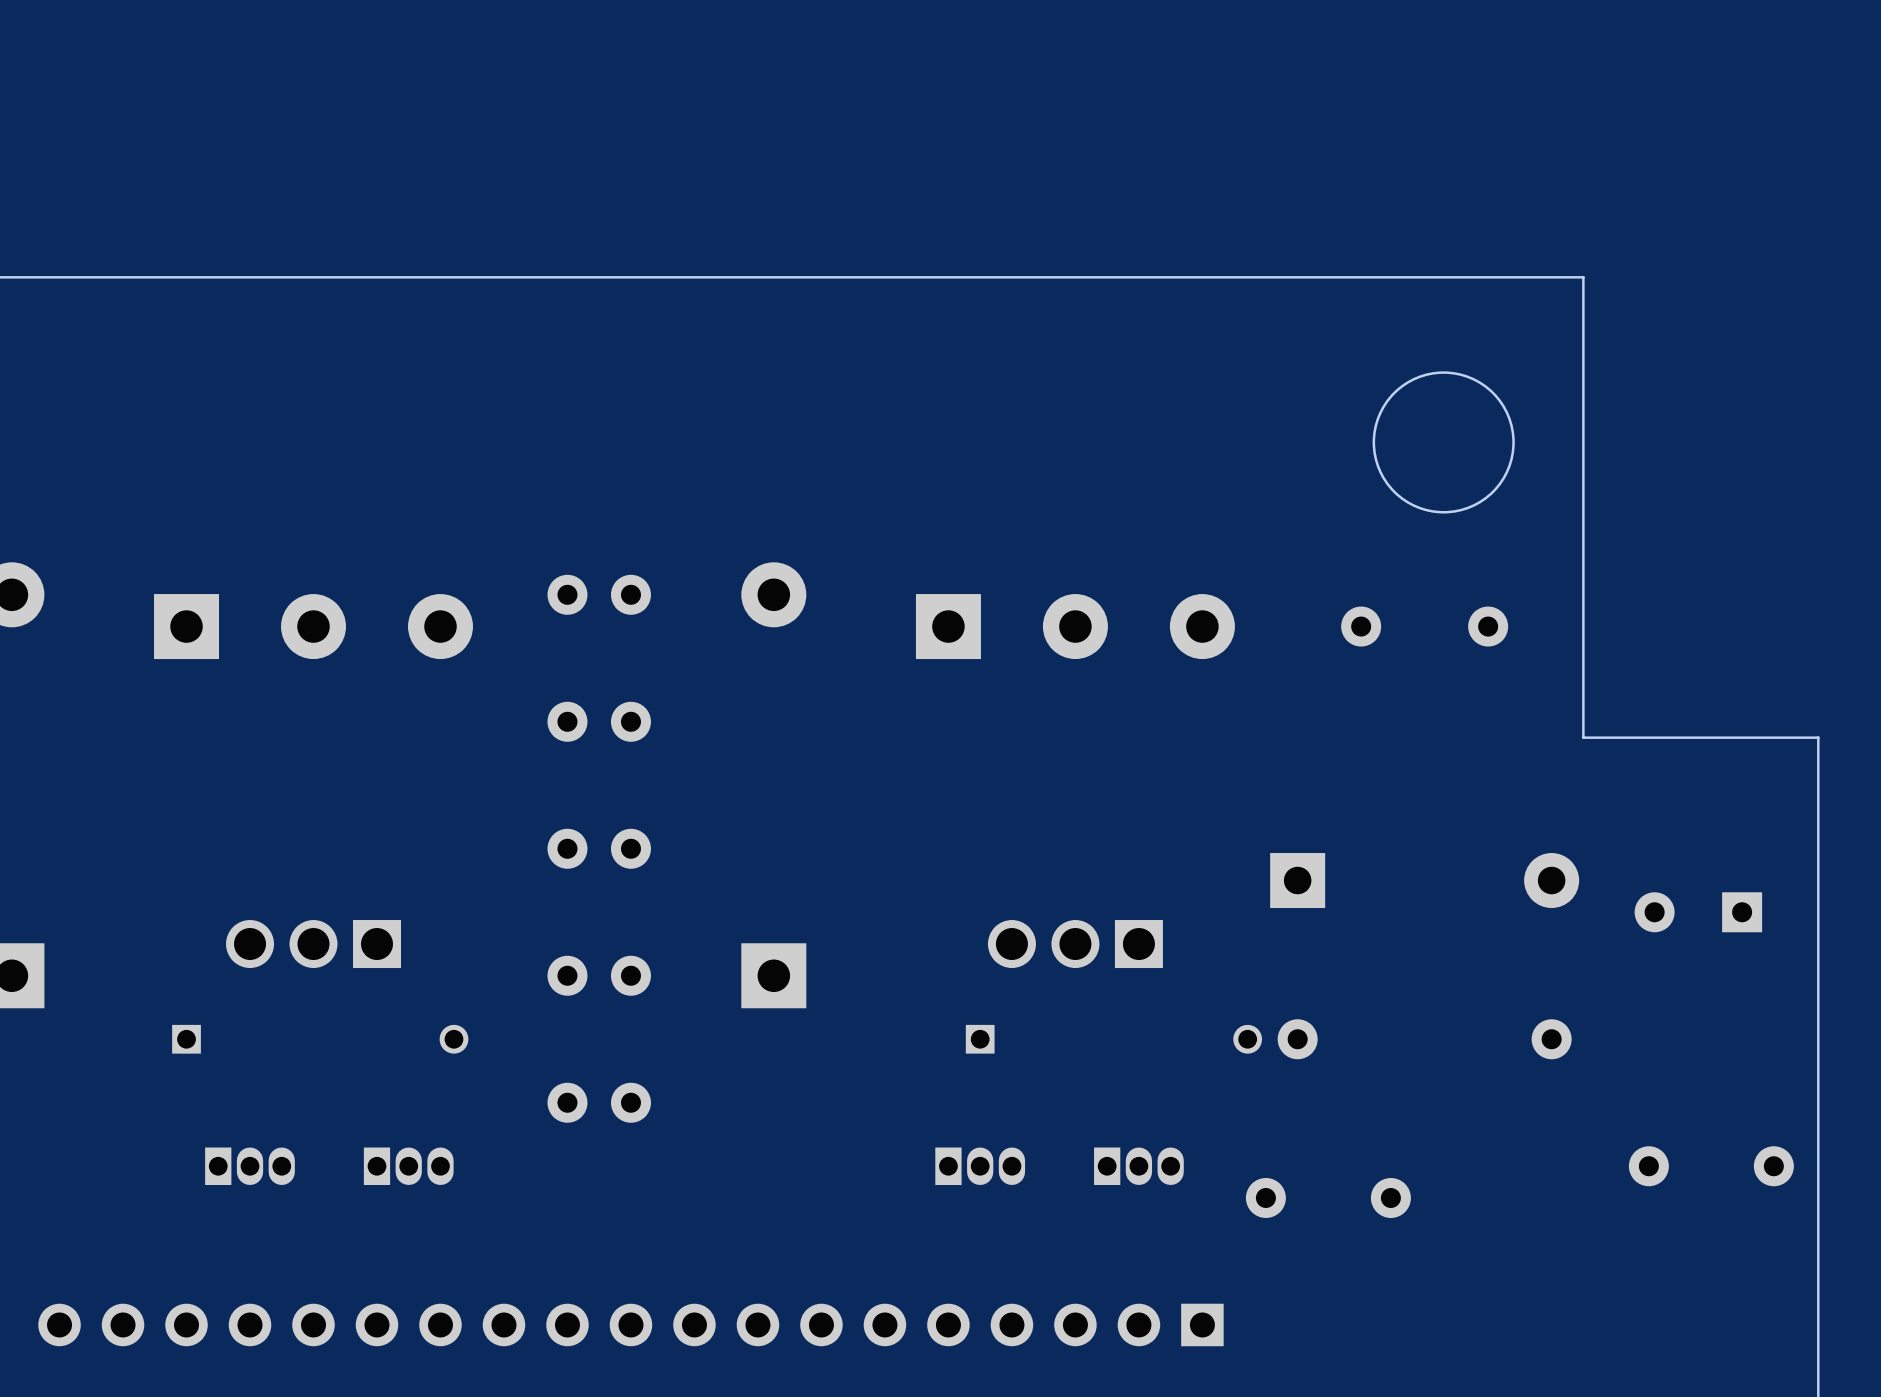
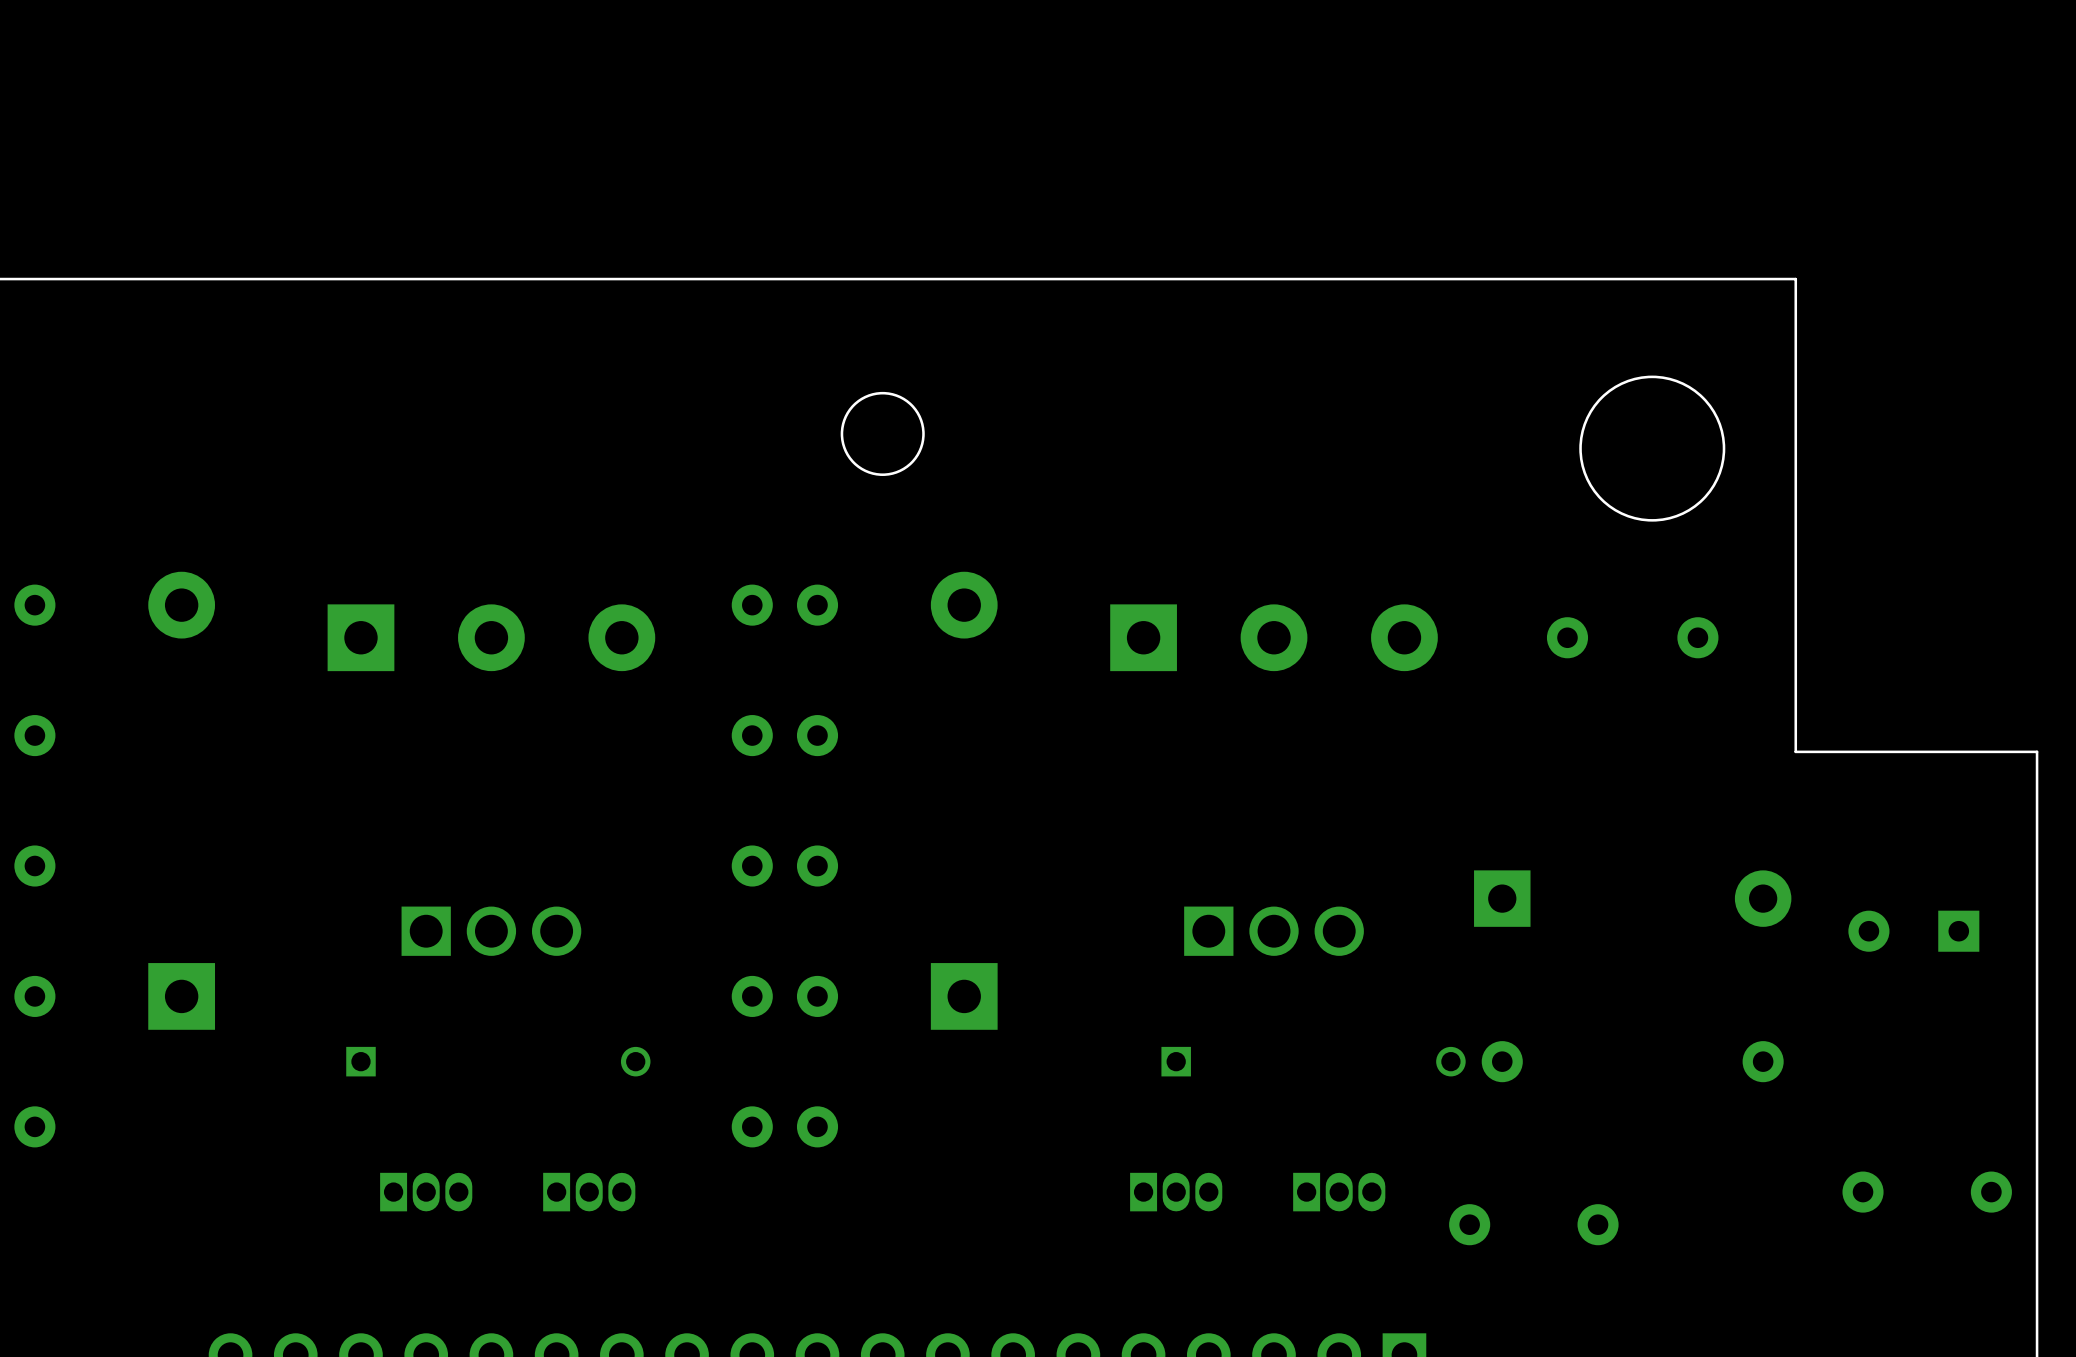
round board edge: none -> [840, 391, 925, 476]
part rotation: 0° (313, 944) -> 180° (491, 931)
part rotation: 0° (1075, 944) -> 180° (1274, 931)

